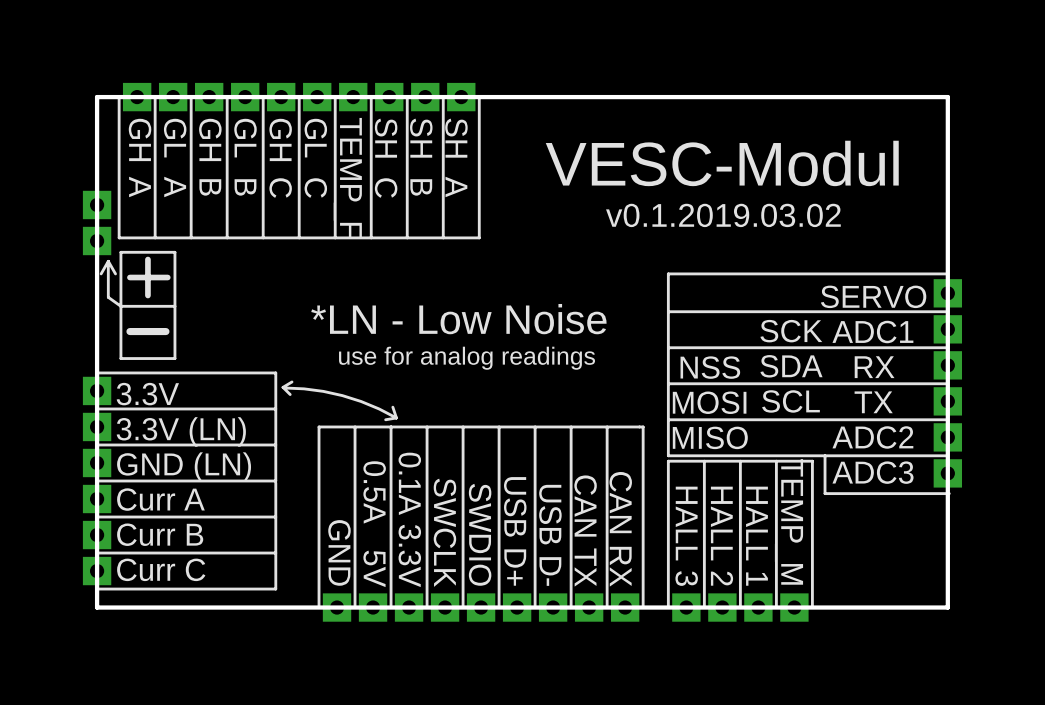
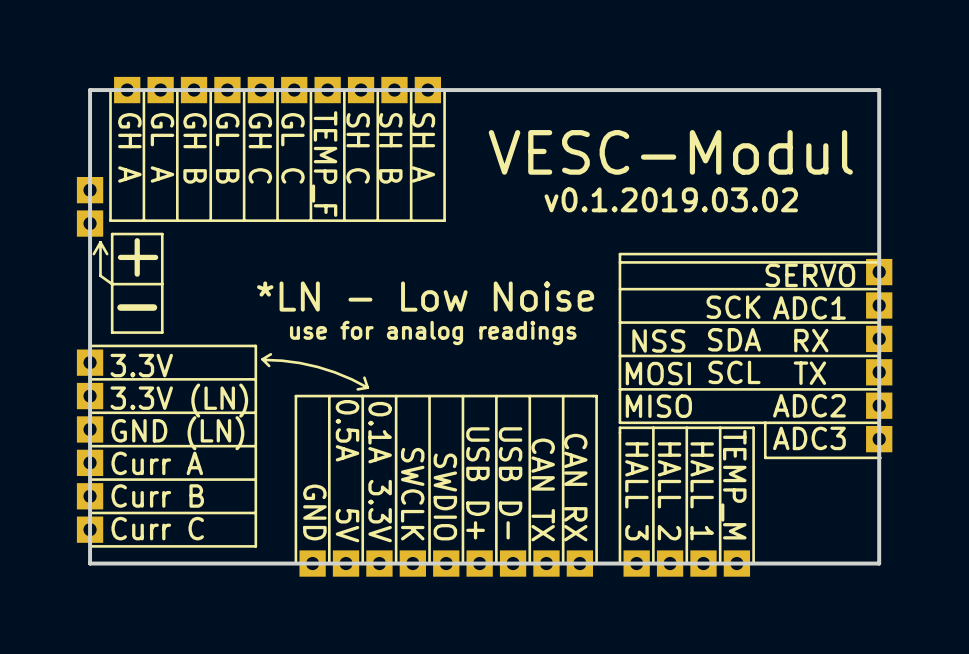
line: none -> (878, 262) (619, 262)

